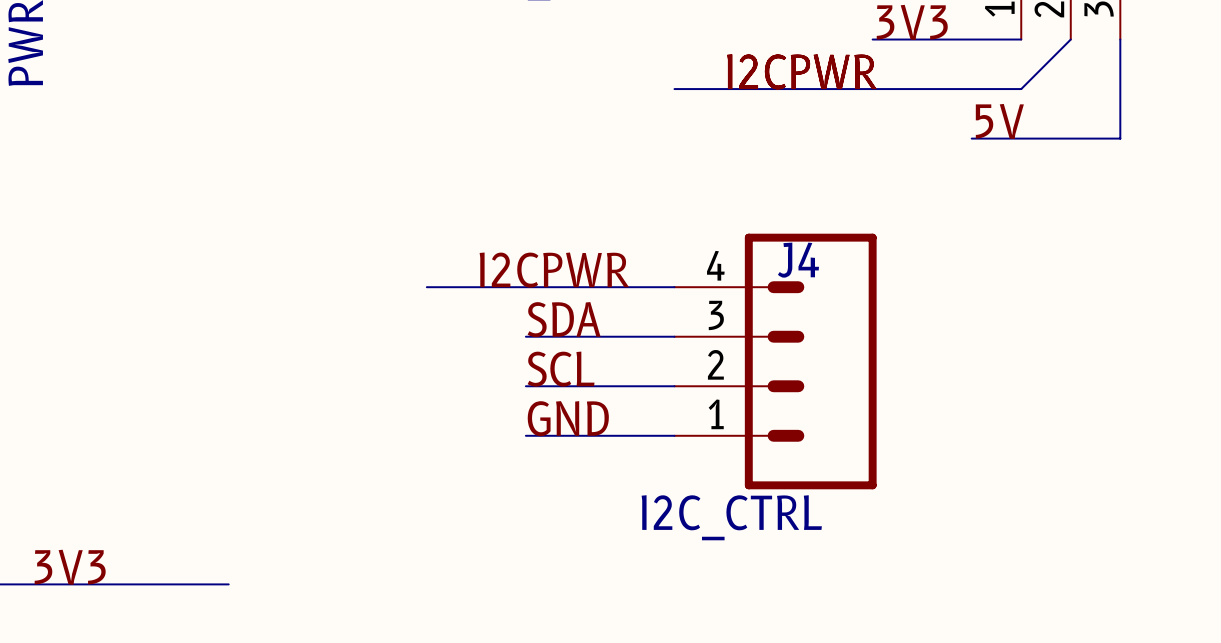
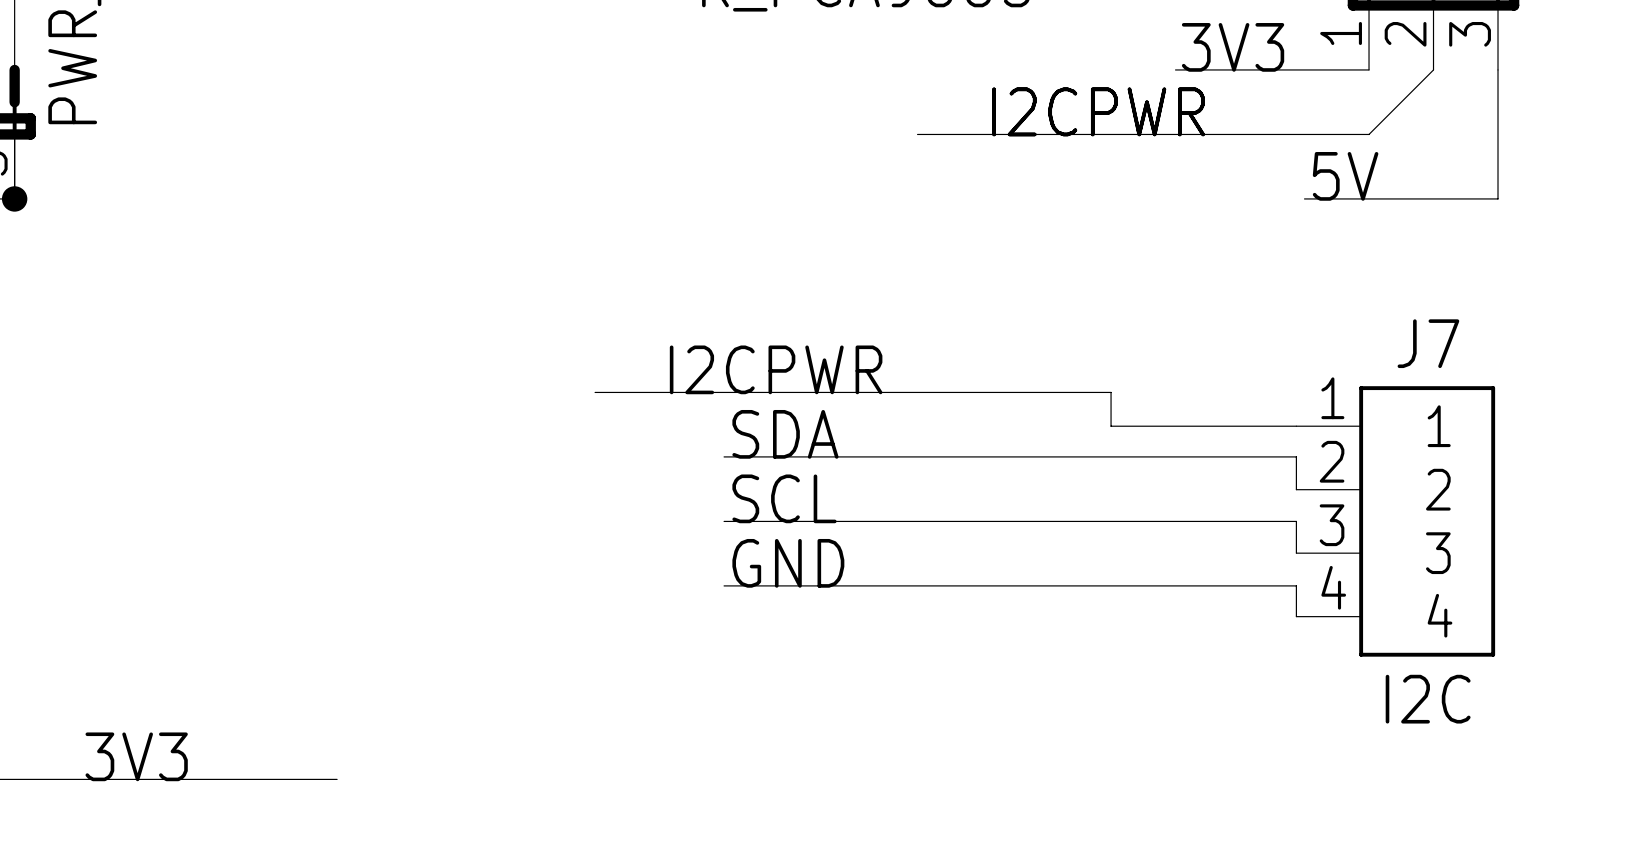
wire: none -> (917, 392) (1111, 392) (1111, 426) (1296, 426)
wire: none -> (917, 456) (1296, 456) (1296, 489)
J4: I2C_CTRL (775, 361) -> none
wire: none -> (917, 521) (1296, 521) (1296, 553)
J7: none -> I2C (1395, 521)
wire: none -> (917, 585) (1296, 585) (1296, 616)

